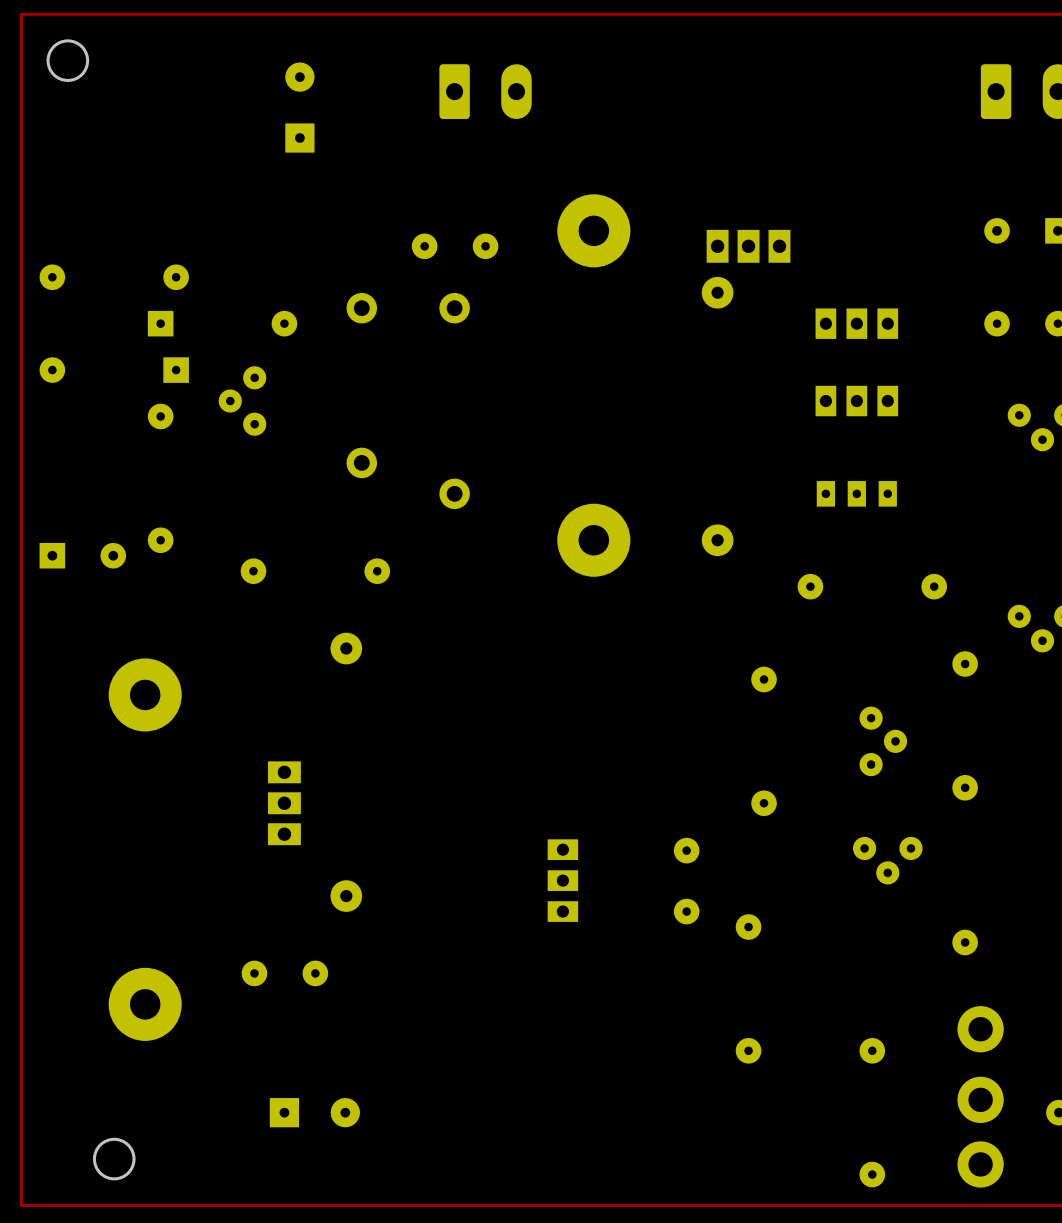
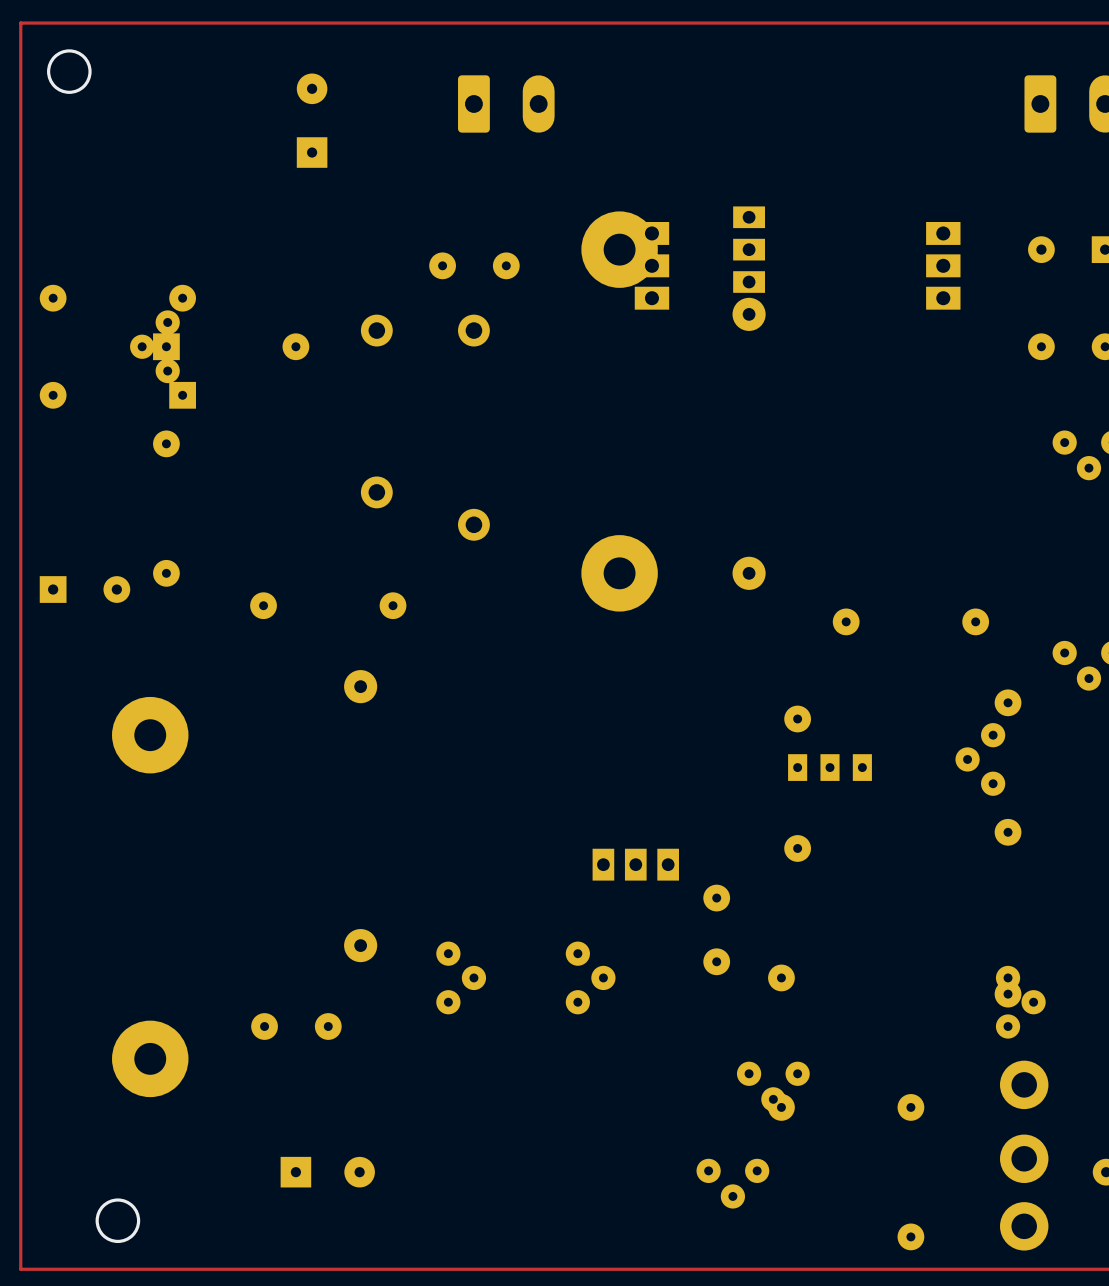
part: none -> (749, 249)
part: none -> (651, 265)
part: (748, 246) -> none
part: none -> (943, 265)
part: (856, 323) -> none
part position: (242, 401) -> (154, 346)
part: (856, 401) -> none
part position: (856, 493) -> (830, 767)
part rotation: 0° (883, 741) -> 180° (980, 759)
part position: (883, 741) -> (980, 759)
part: (284, 803) -> none
part: (887, 860) -> none
part rotation: 0° (562, 880) -> 90° clockwise (635, 864)
part position: (562, 880) -> (635, 864)
part: none -> (461, 977)
part: none -> (590, 977)
part: none -> (1020, 1002)
part: none -> (773, 1086)
part: none -> (732, 1183)

